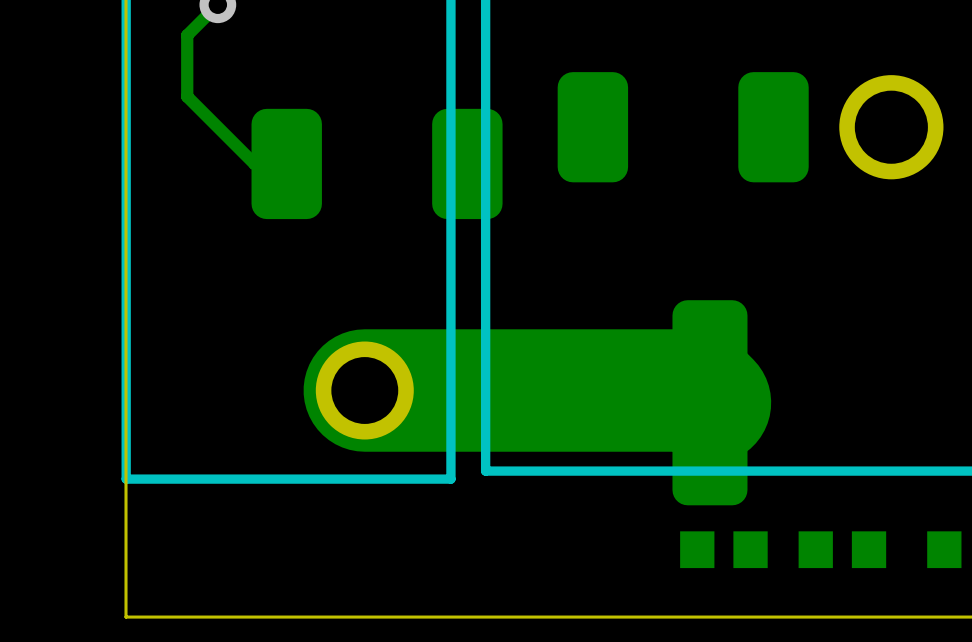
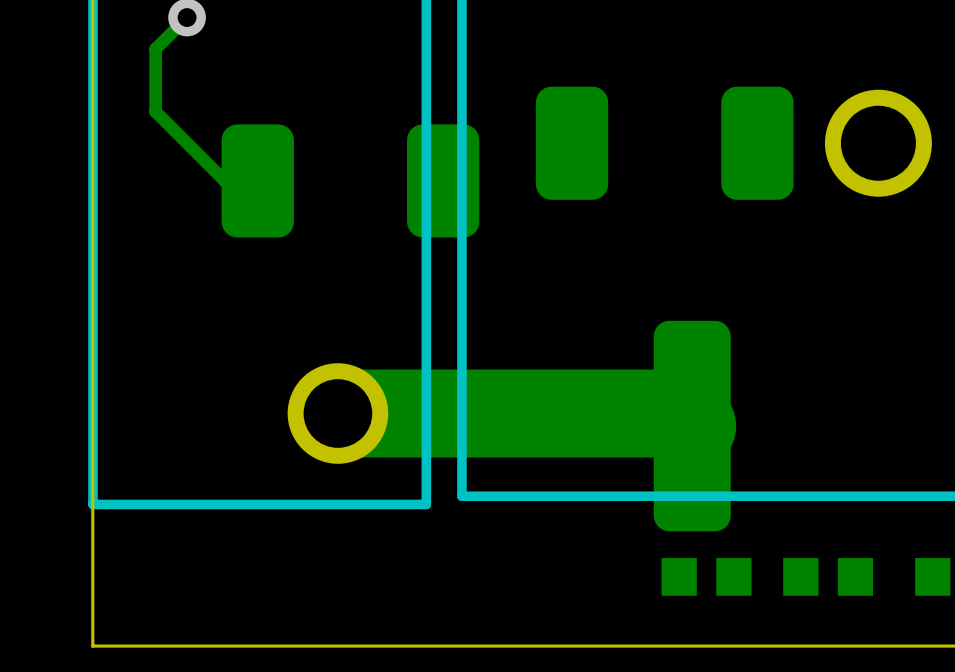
bottom track width: thick (364, 390) (697, 390) (709, 402) -> thin (337, 413) (679, 413) (692, 426)

